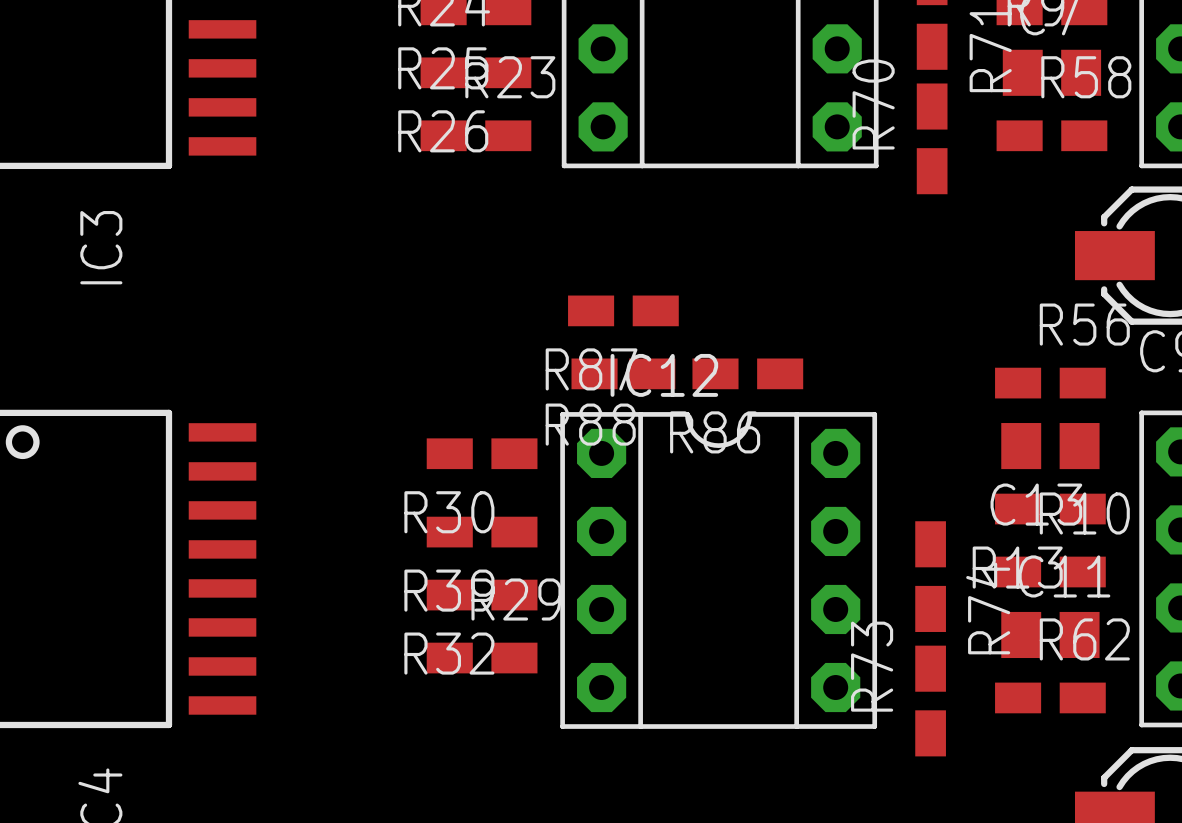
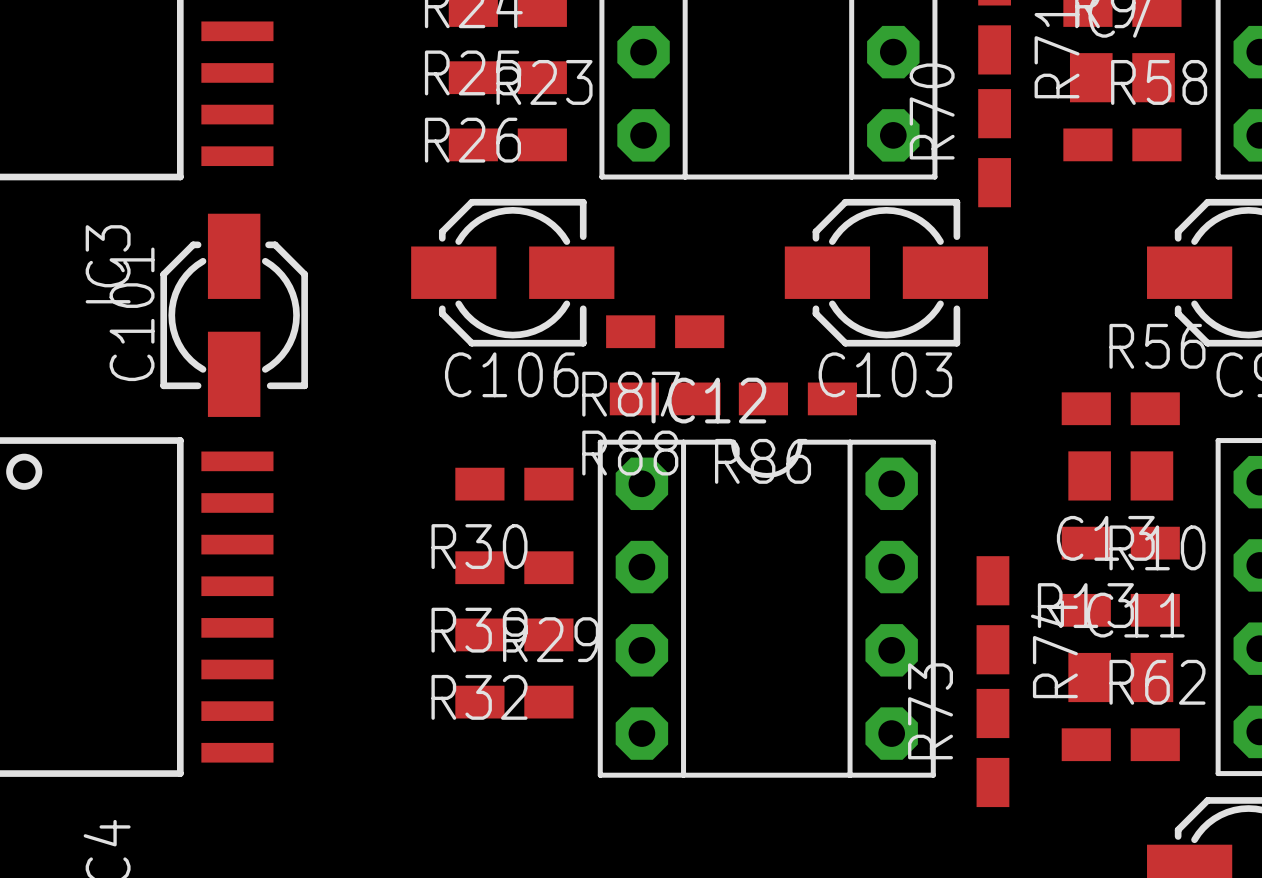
C106: none -> (512, 272)
C103: none -> (886, 272)
C101: none -> (234, 315)

